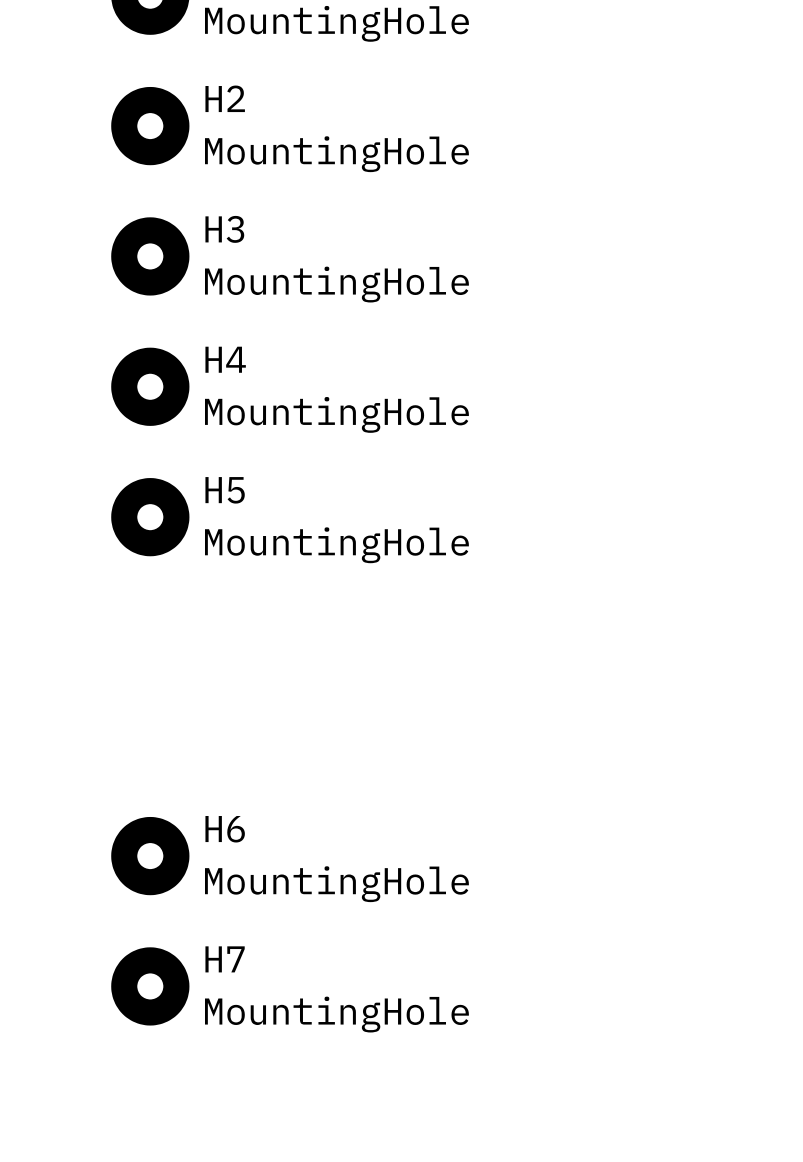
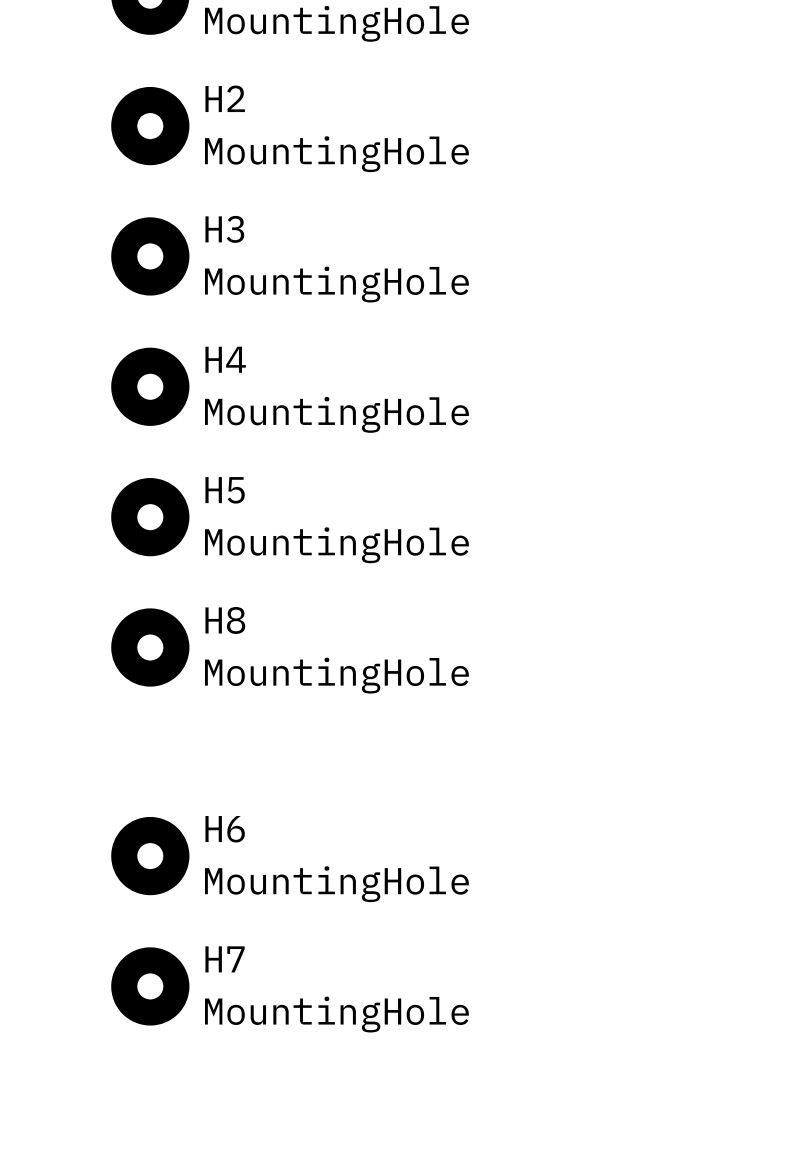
H8: none -> MountingHole (150, 647)

